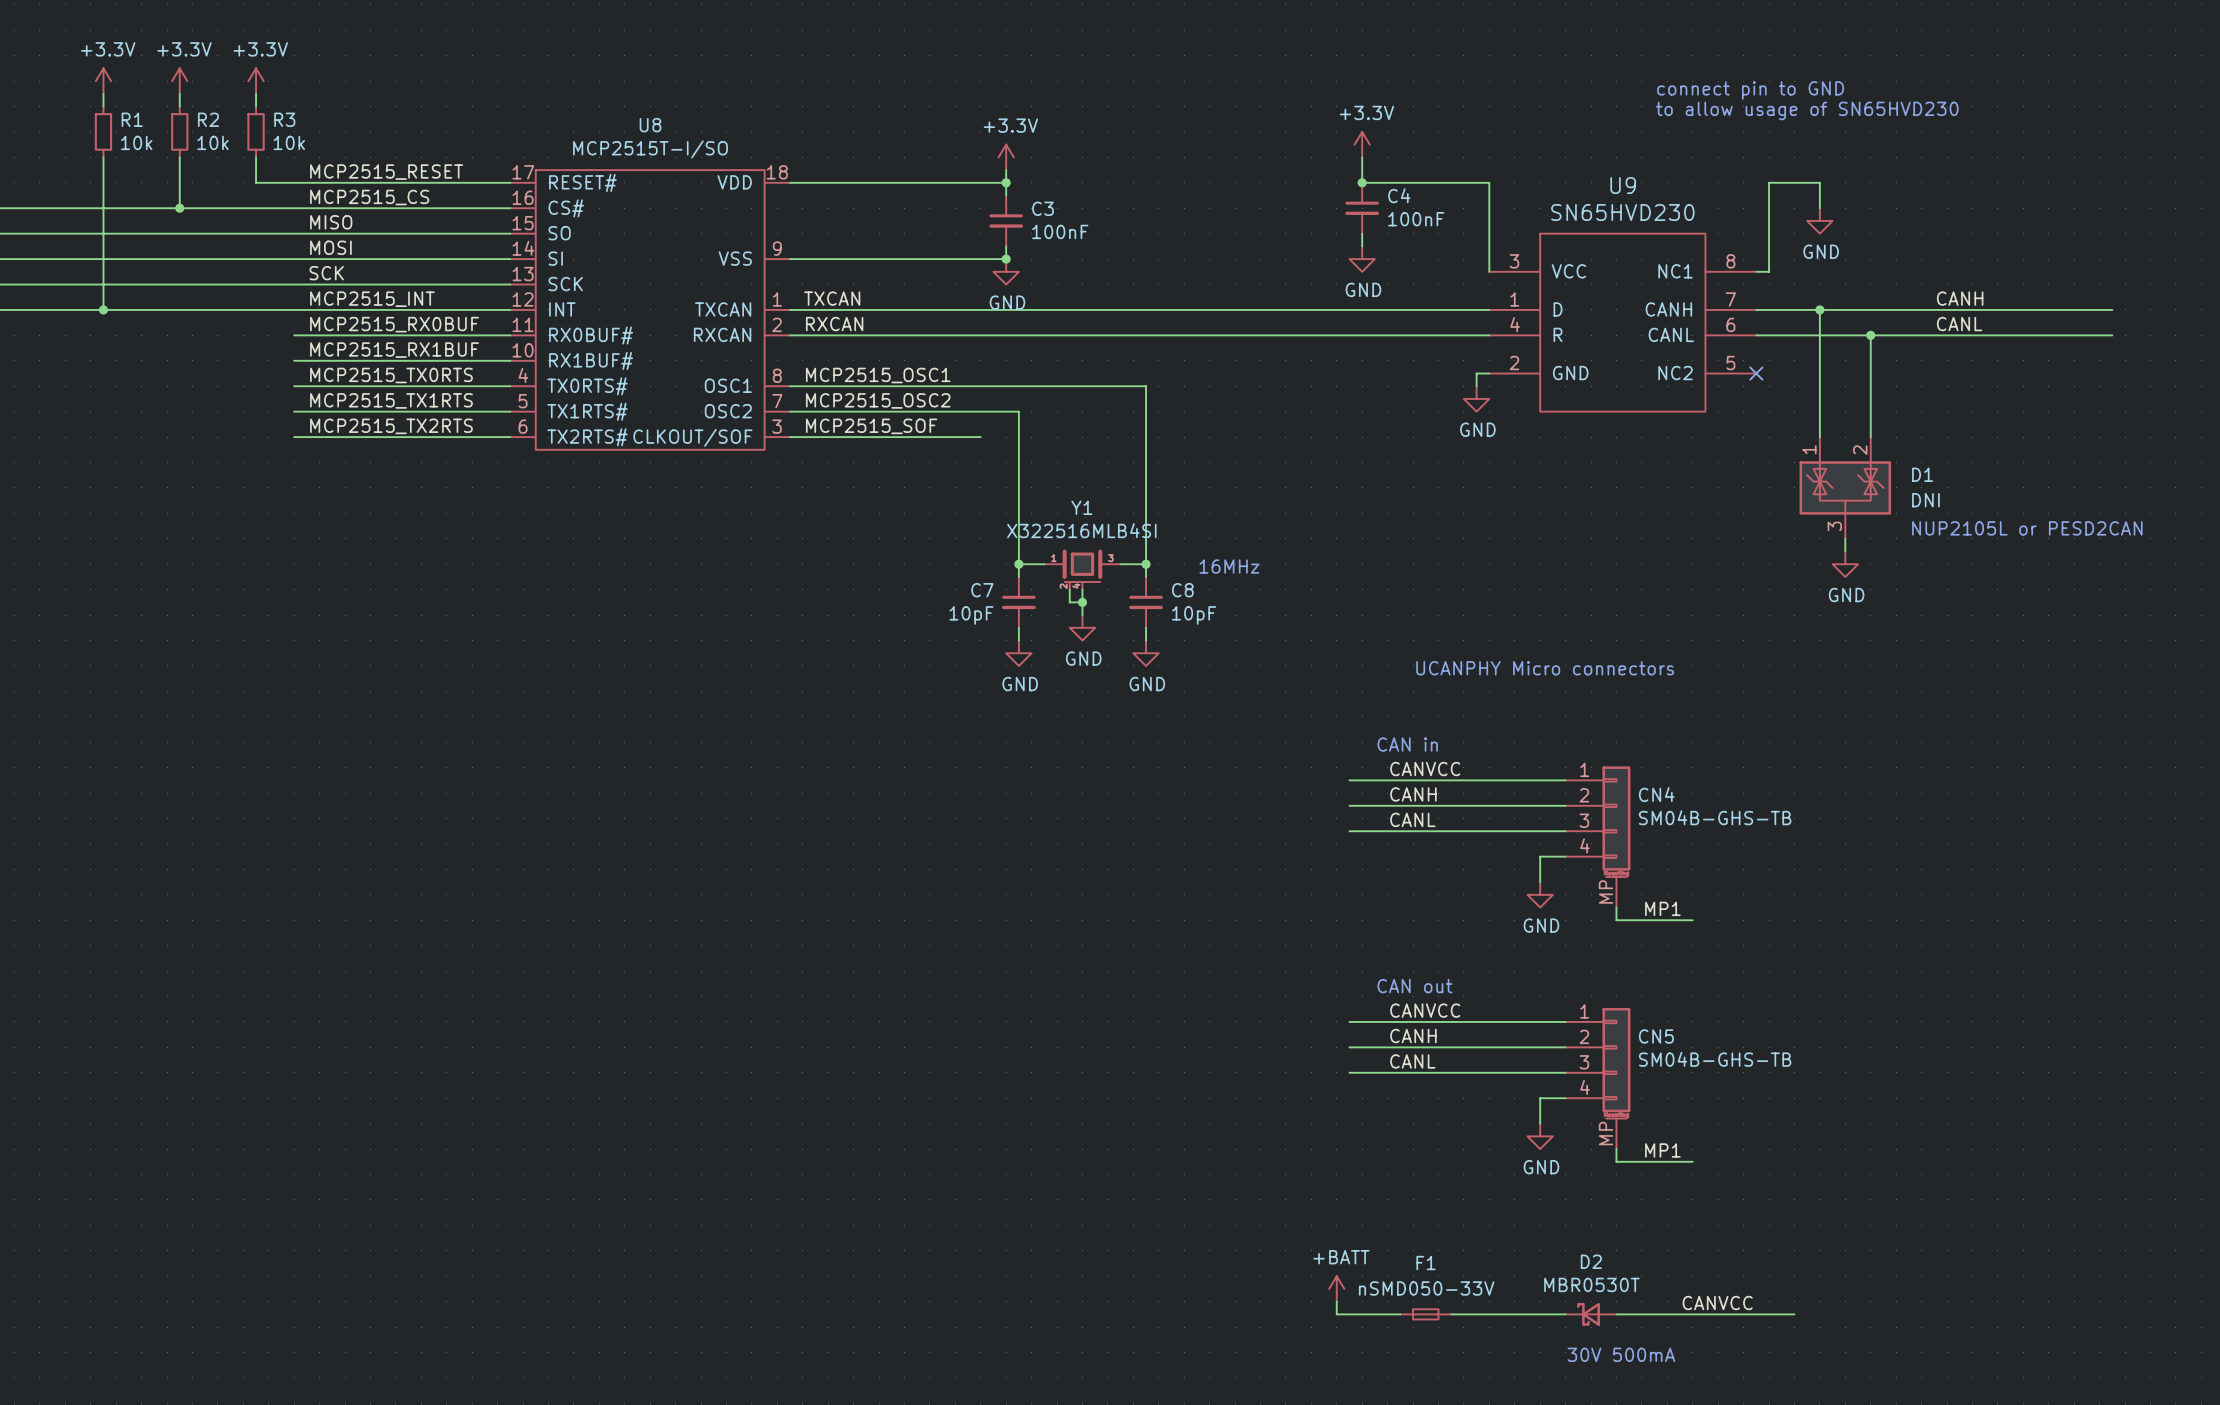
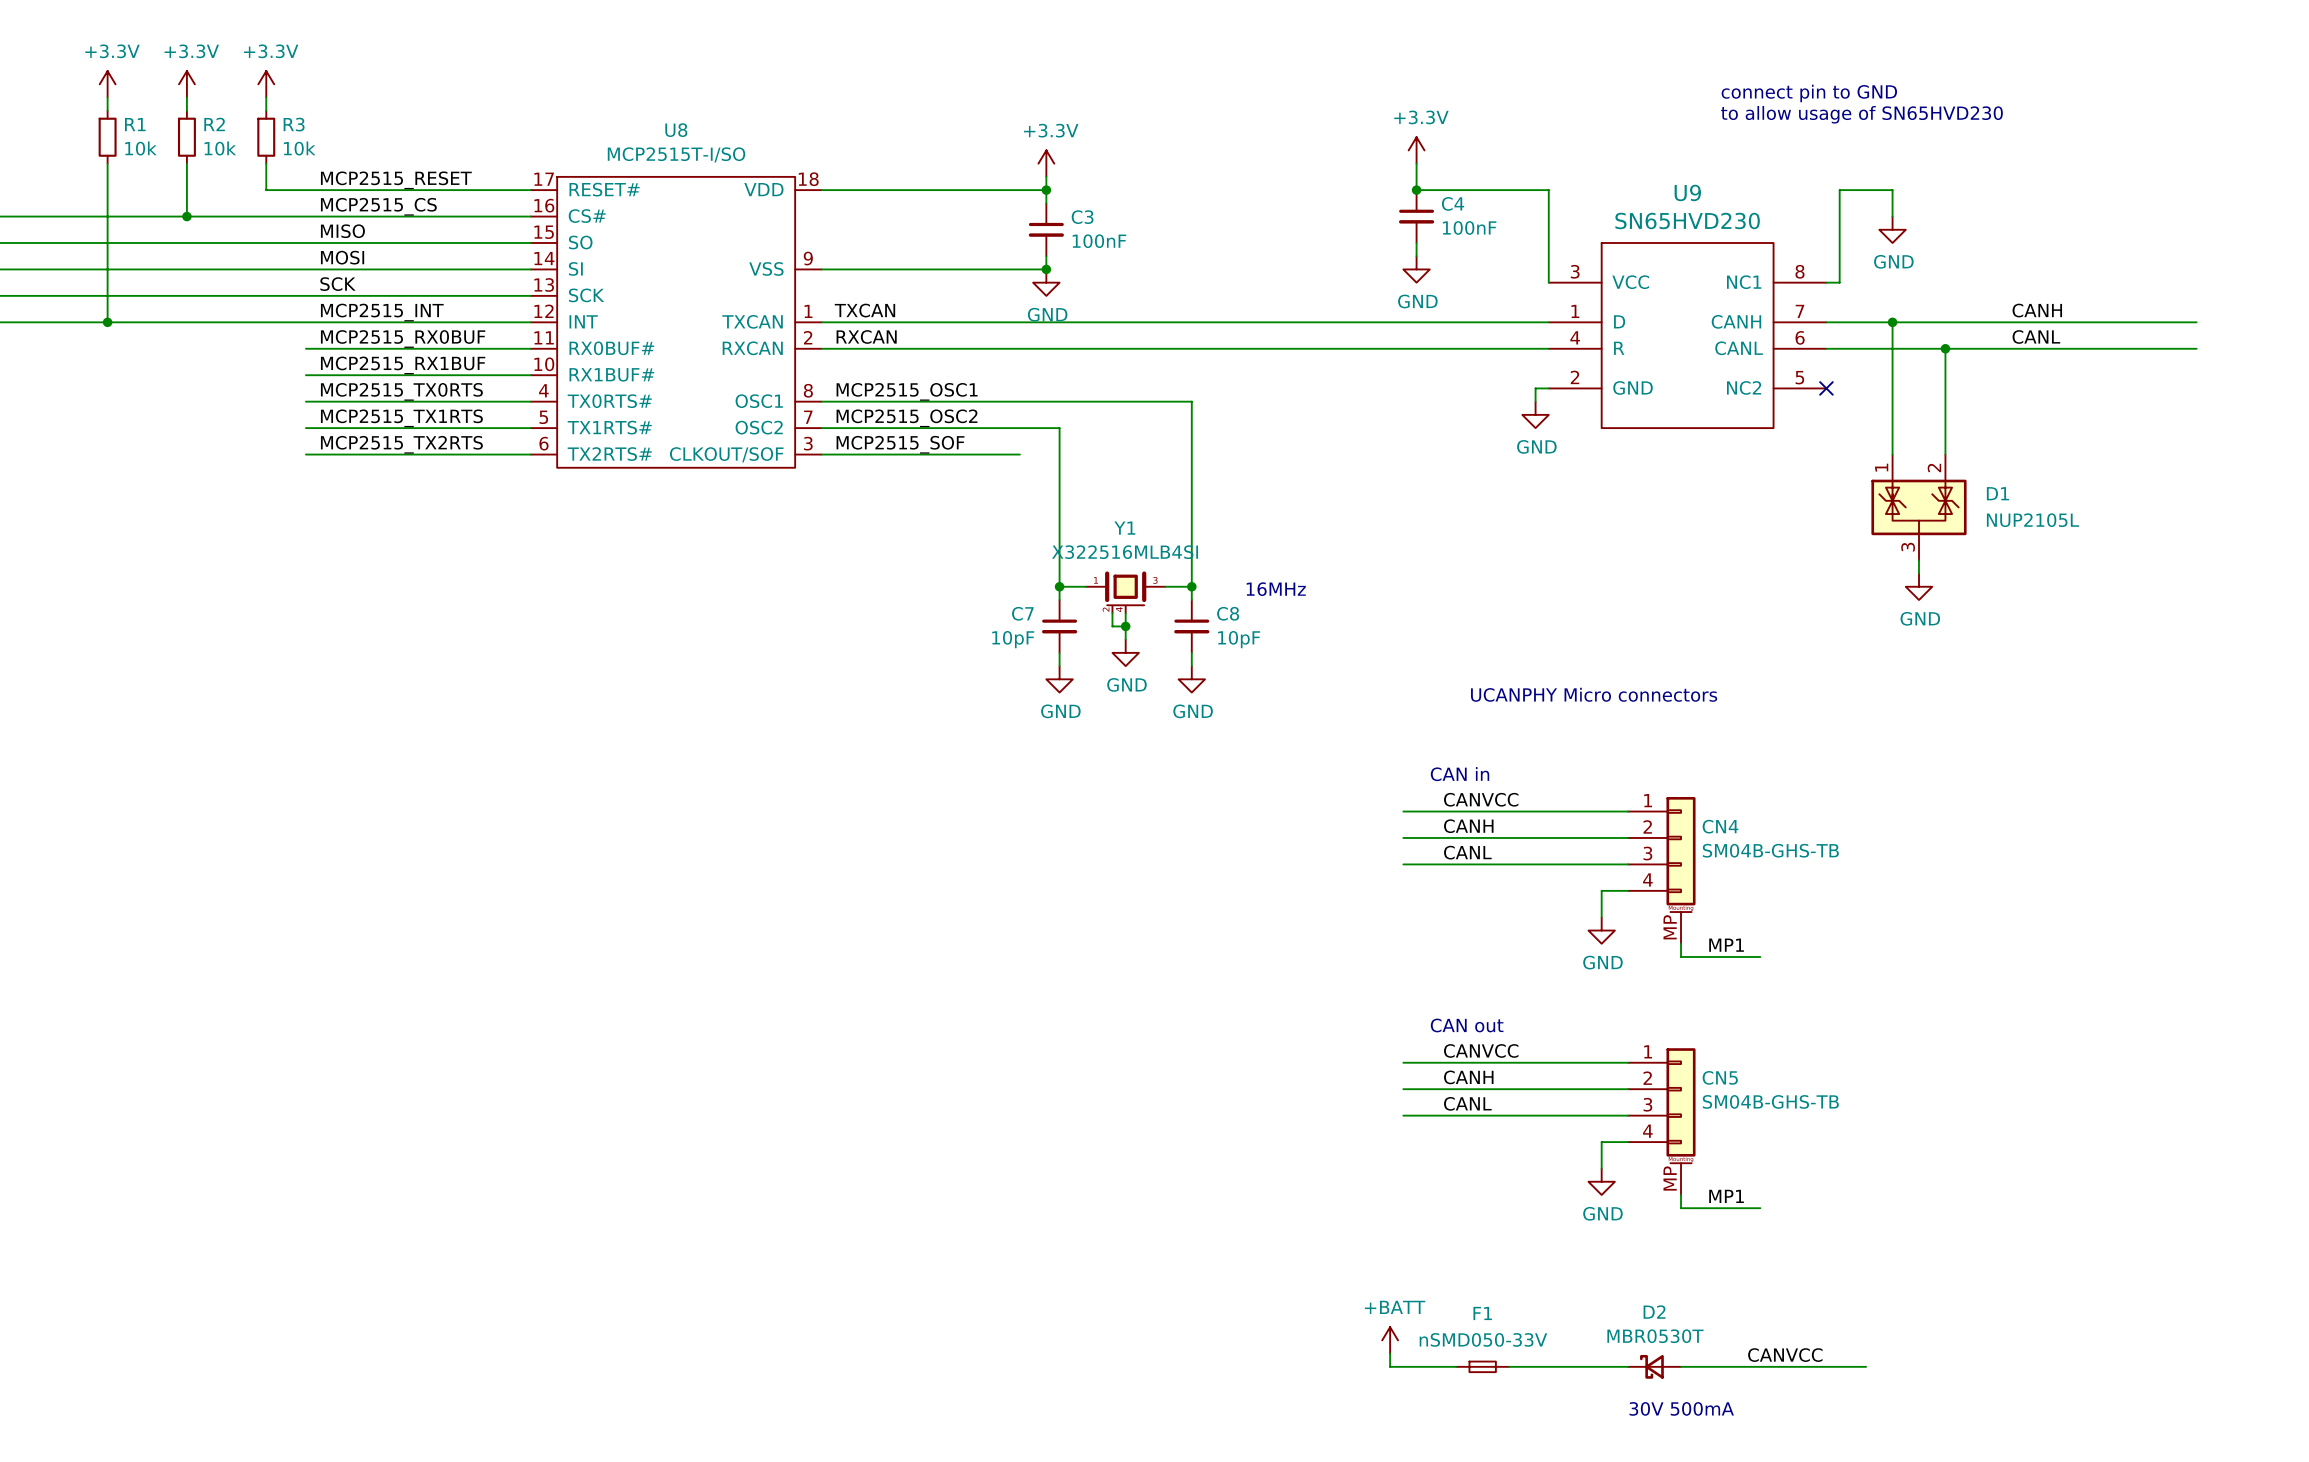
D1 value: DNI (1925, 500) -> NUP2105L (2032, 520)
text: NUP2105L or PESD2CAN (2027, 528) -> none

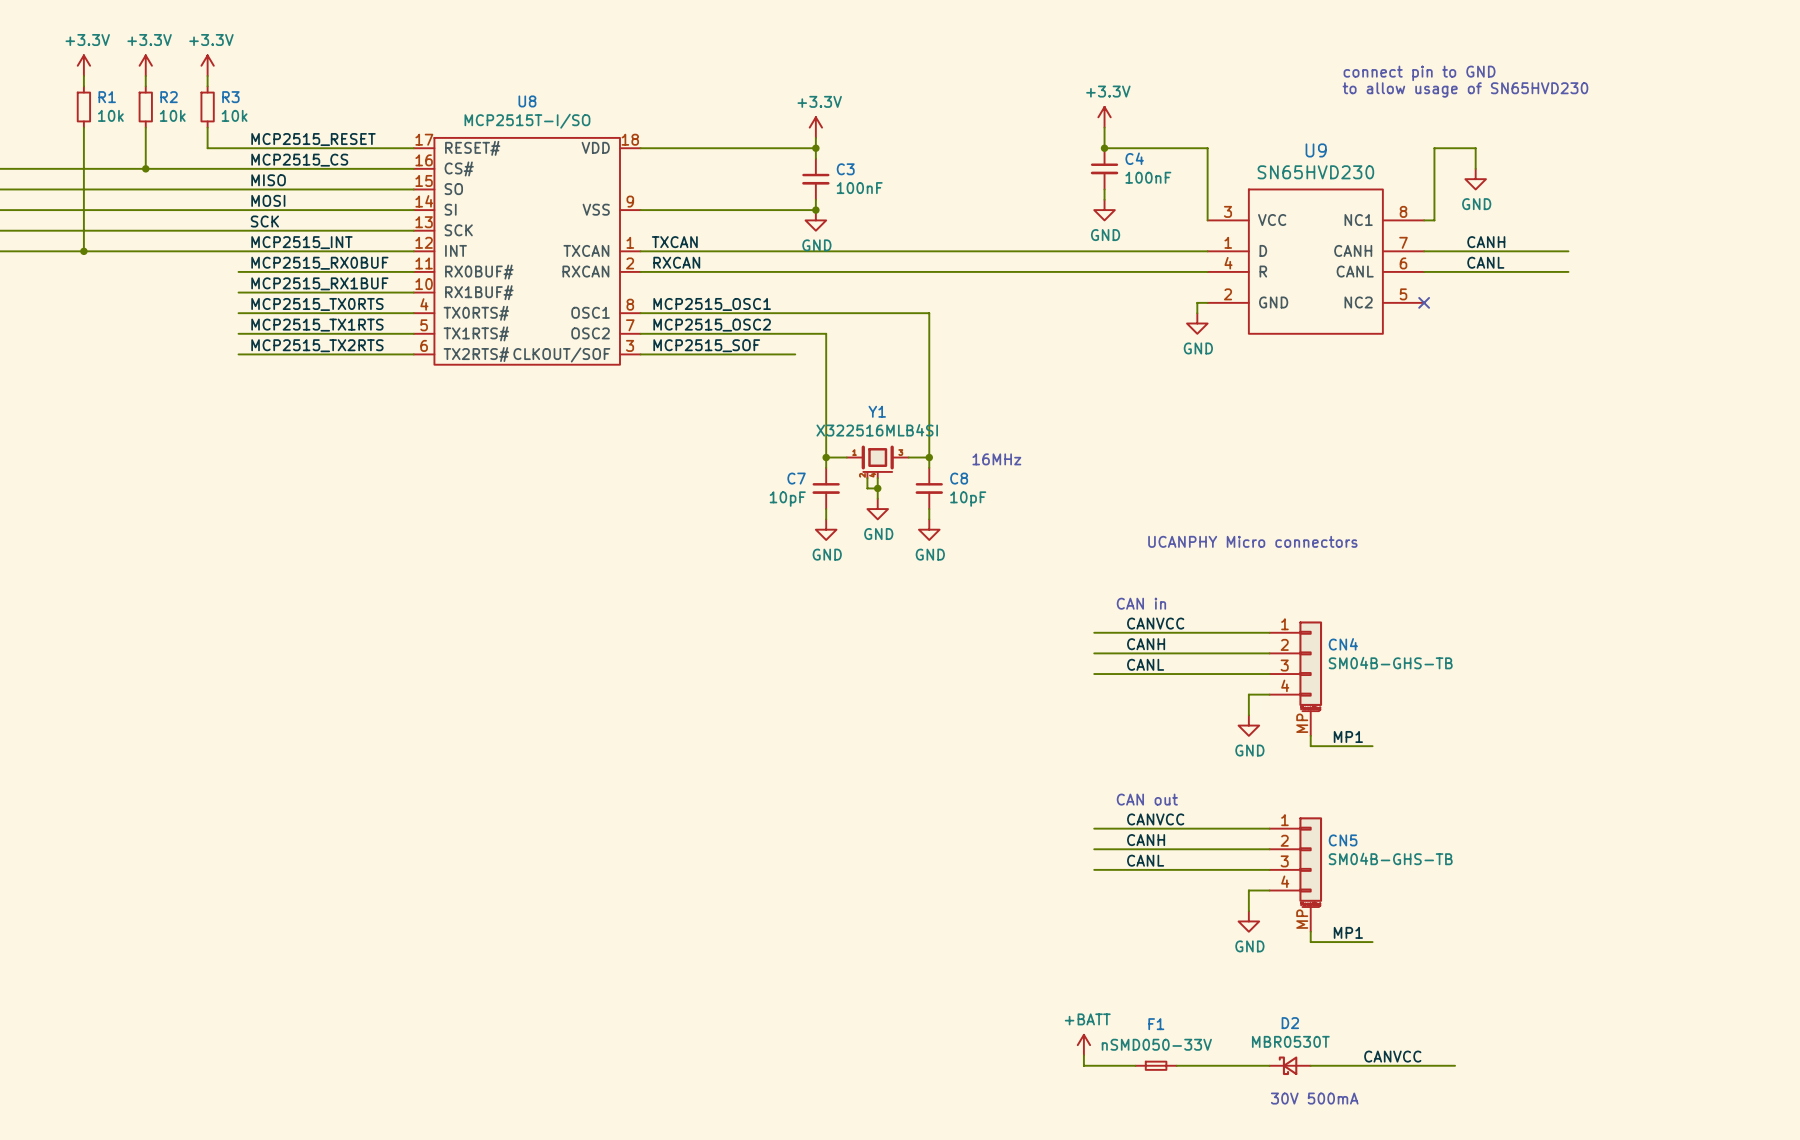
label position: CANH (2037, 310) -> CANH (1486, 242)
wire: (1892, 322) (1892, 454) -> none
junction: (1892, 322) -> none
wire: (2011, 322) (2196, 322) -> none
label position: CANL (2036, 336) -> CANL (1485, 262)
wire: (1945, 348) (1945, 454) -> none
junction: (1945, 348) -> none
wire: (2011, 348) (2196, 348) -> none
D1: NUP2105L (1919, 507) -> none
wire: (1919, 560) (1919, 573) -> none
power symbol: GND (1919, 586) -> none

